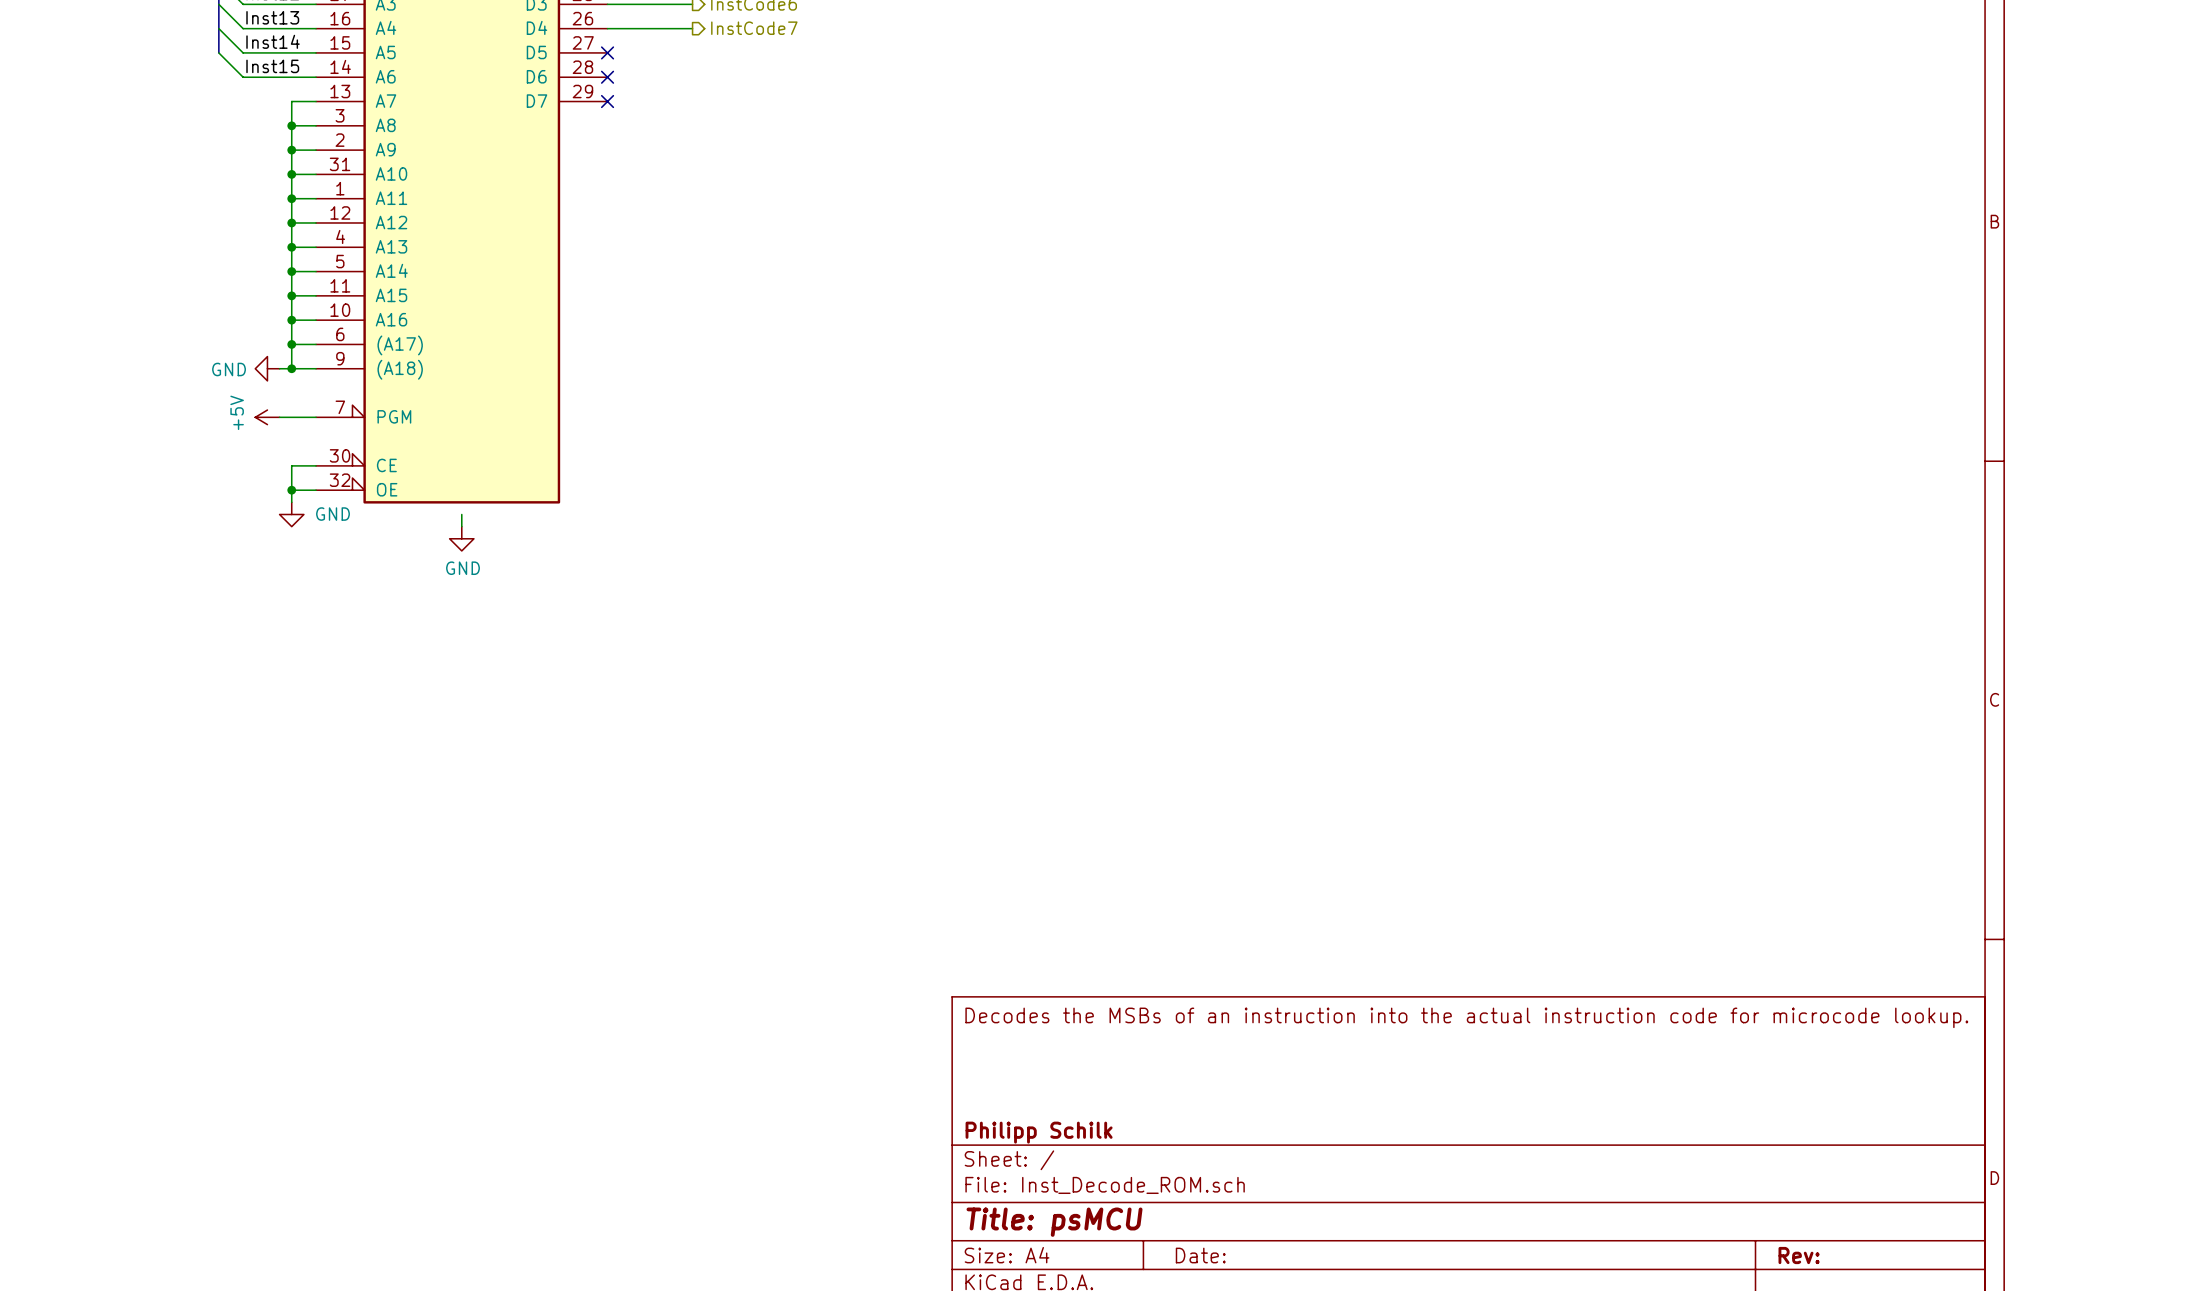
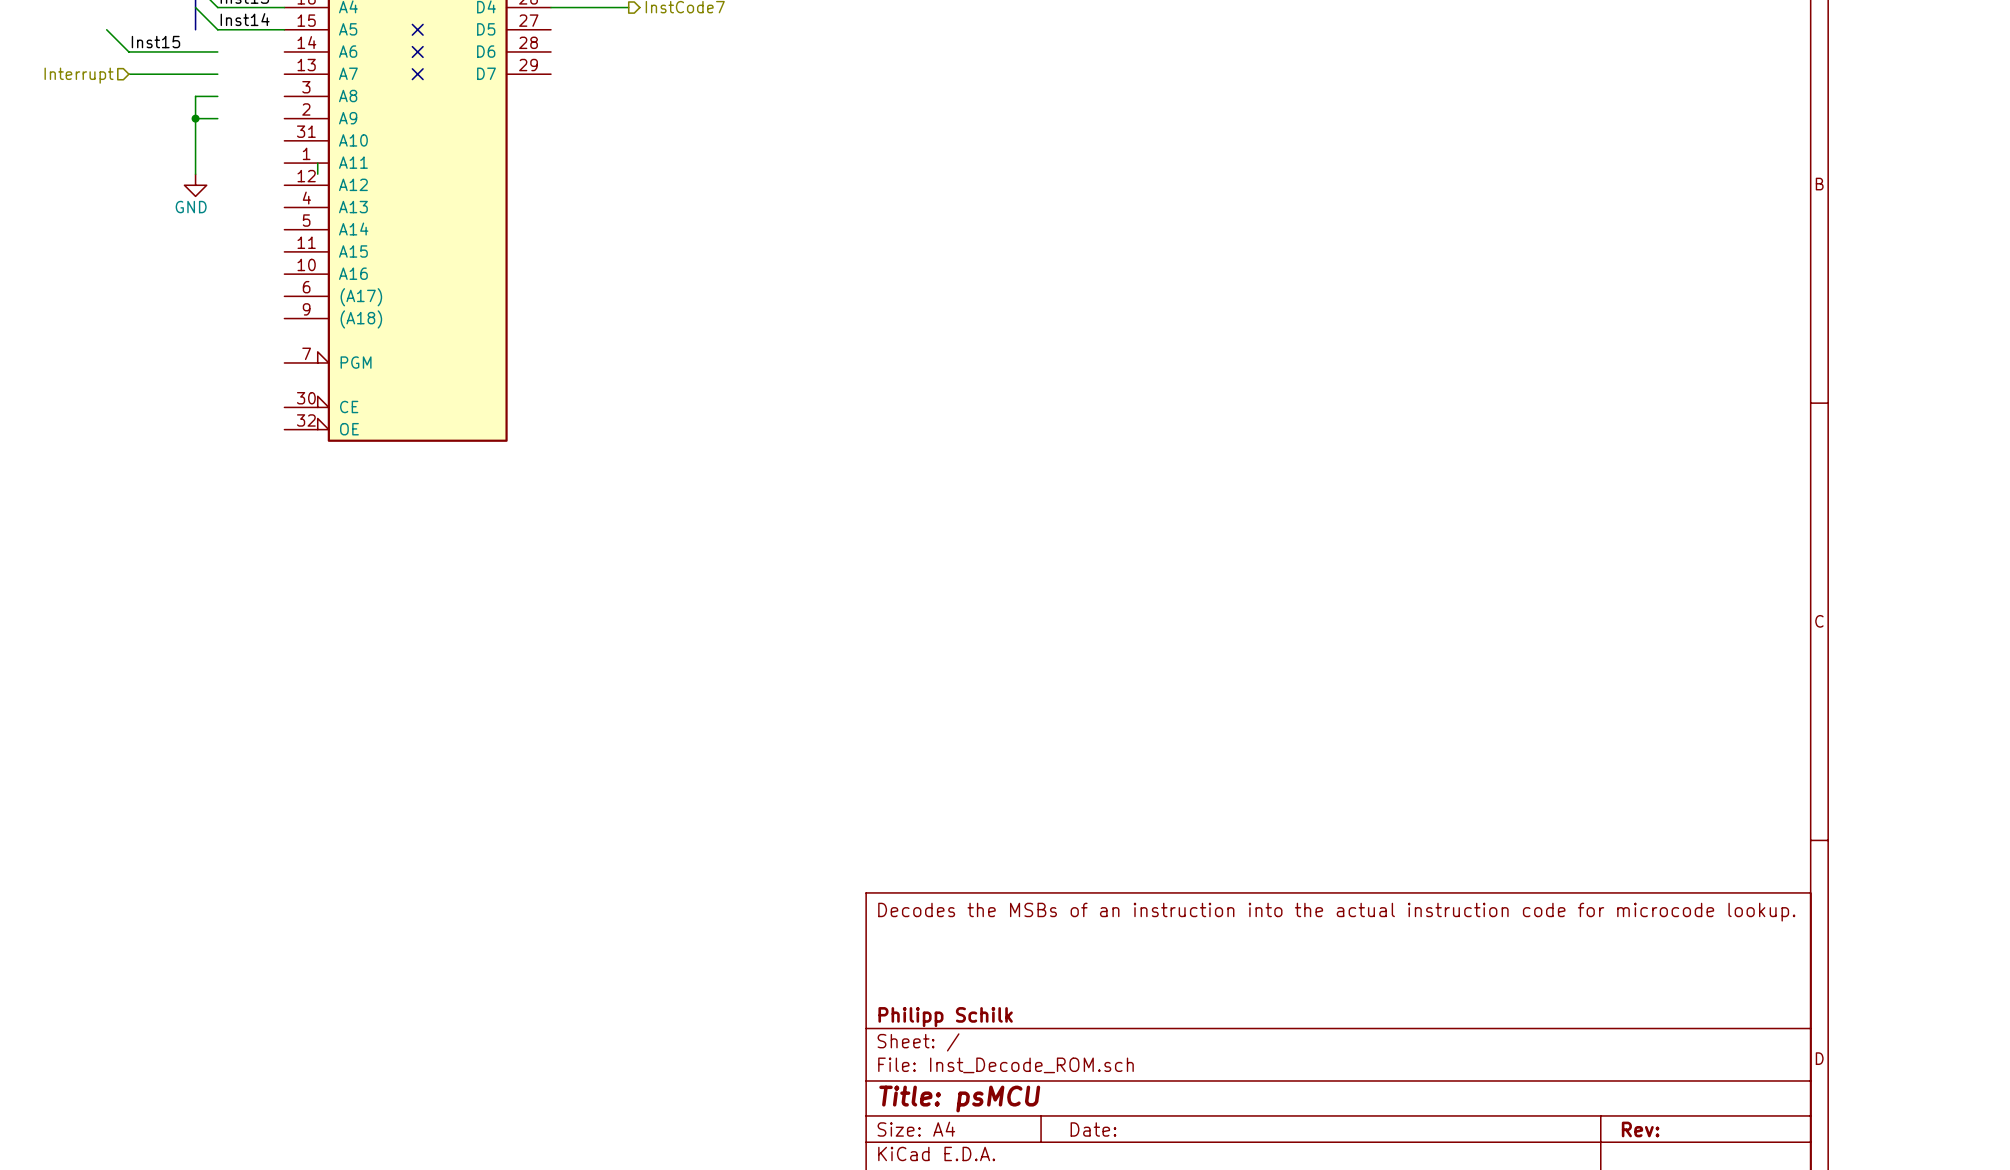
wire: none -> (106, 29) (128, 51) (217, 51)
wire: (218, 52) (243, 77) (316, 77) -> none
no-connect mark: none -> (417, 29)
no-connect mark: (607, 52) -> none
label position: Inst15 (272, 66) -> Inst15 (155, 42)
no-connect mark: none -> (417, 51)
no-connect mark: (607, 77) -> none
wire: none -> (128, 74) (217, 74)
wire: (316, 101) (291, 101) (291, 368) -> none
no-connect mark: none -> (417, 74)
no-connect mark: (607, 101) -> none
hierarchical label: none -> Interrupt (79, 75)
wire: none -> (217, 96) (195, 96) (195, 174)
wire: (291, 125) (316, 125) -> none
junction: (291, 125) -> none
junction: none -> (195, 118)
wire: (291, 150) (316, 150) -> (195, 118) (217, 118)
junction: (291, 150) -> none
wire: (291, 174) (316, 174) -> none
junction: (291, 174) -> none
wire: (291, 198) (316, 198) -> none
junction: (291, 198) -> none
wire: none -> (317, 163) (317, 174)
power symbol: none -> GND (195, 185)
wire: (291, 222) (316, 222) -> none
junction: (291, 222) -> none
wire: (291, 247) (316, 247) -> none
junction: (291, 247) -> none
wire: (291, 271) (316, 271) -> none
junction: (291, 271) -> none
wire: (291, 295) (316, 295) -> none
junction: (291, 295) -> none
wire: (291, 320) (316, 320) -> none
junction: (291, 320) -> none
wire: (291, 344) (316, 344) -> none
junction: (291, 344) -> none
power symbol: GND (267, 368) -> none
wire: (279, 368) (316, 368) -> none
junction: (291, 368) -> none
power symbol: +5V (267, 417) -> none
wire: (279, 417) (316, 417) -> none
wire: (316, 465) (291, 465) (291, 502) -> none
wire: (291, 490) (316, 490) -> none
junction: (291, 490) -> none
power symbol: GND (291, 514) -> none
wire: (461, 514) (461, 526) -> none
power symbol: GND (461, 538) -> none

